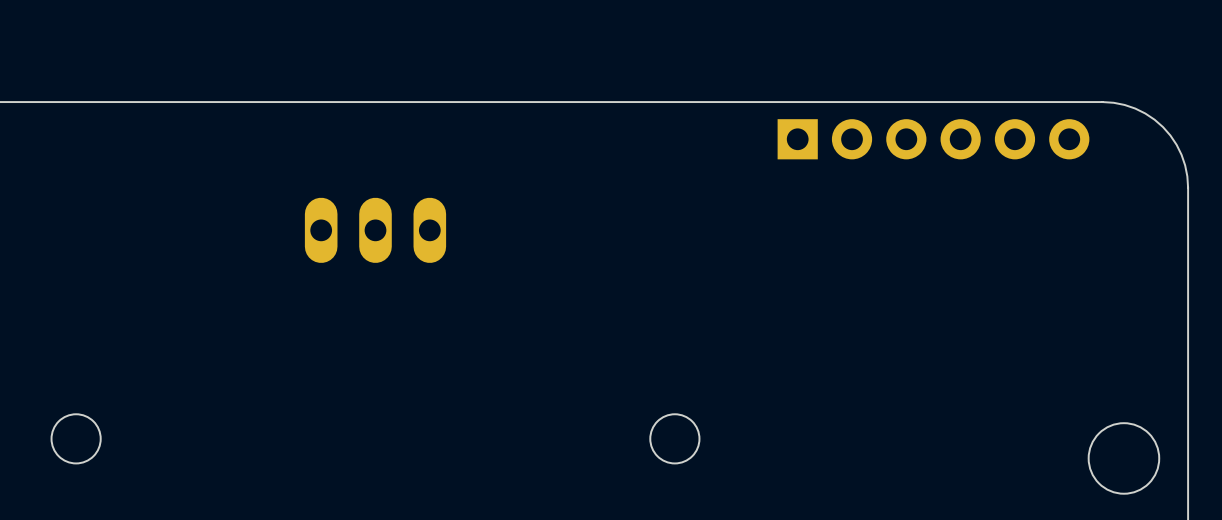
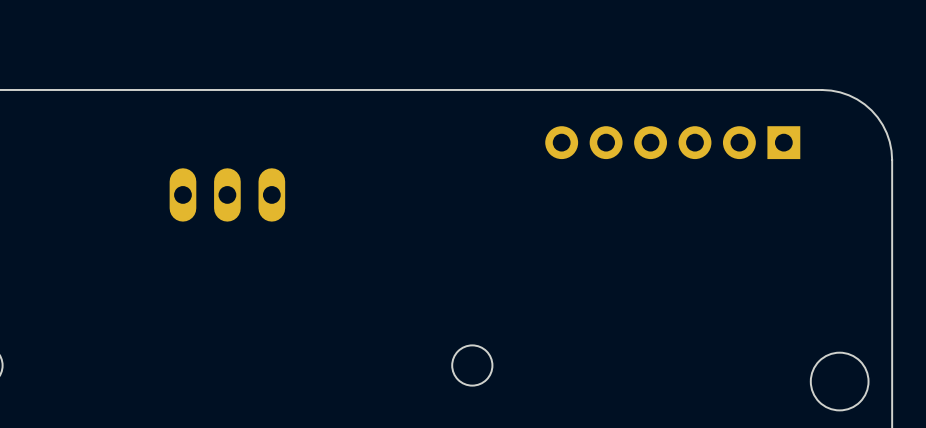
part rotation: 0° (933, 139) -> 180° (672, 142)

